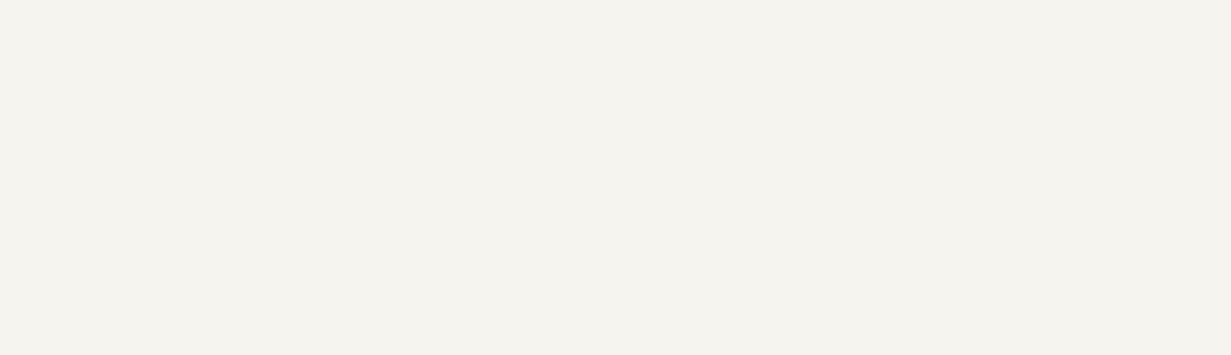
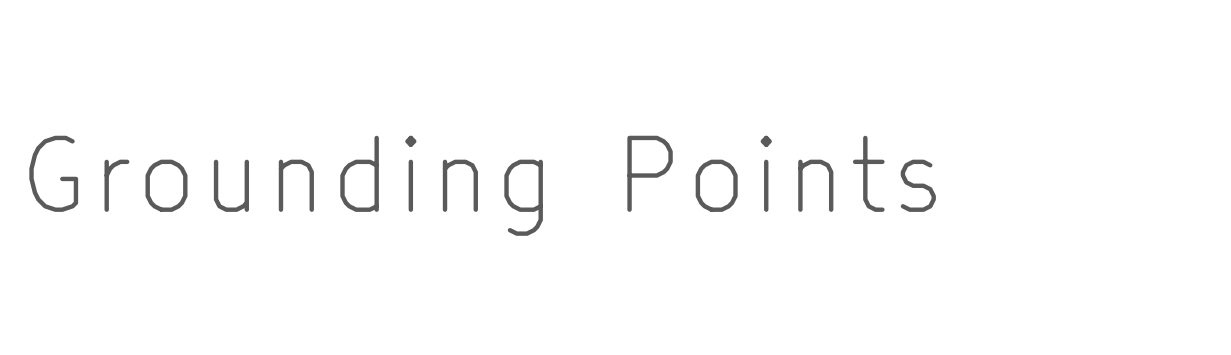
text: none -> Grounding Points (482, 185)

